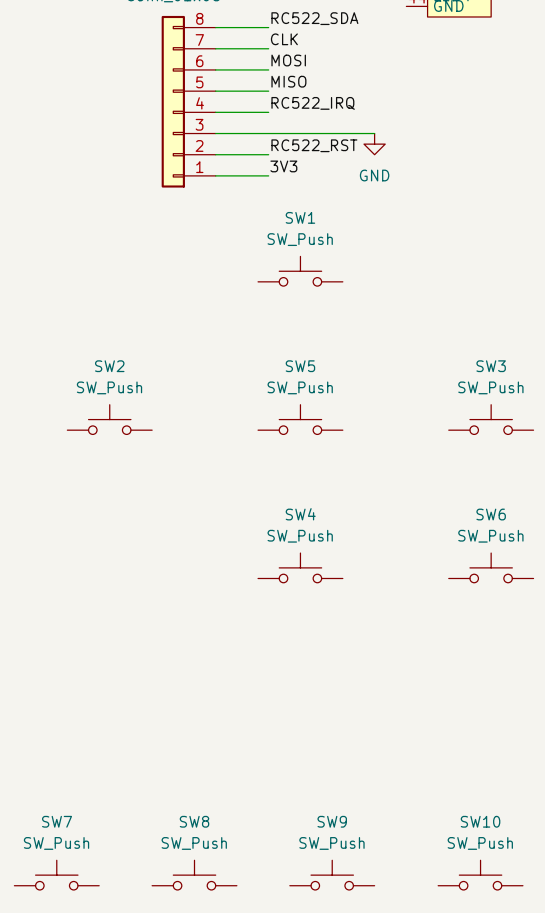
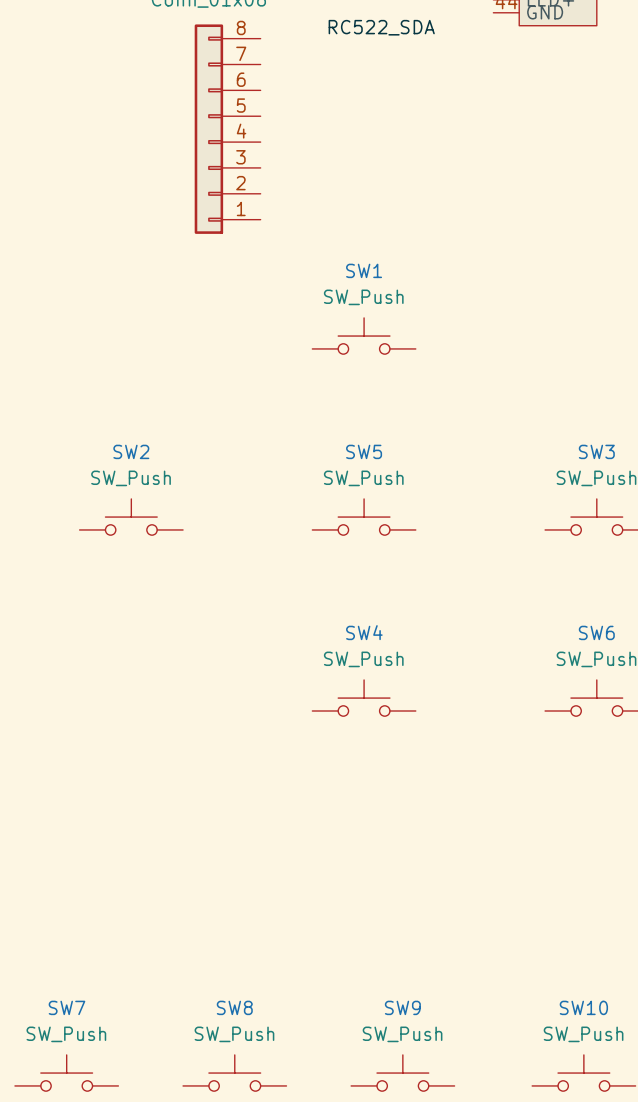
wire: (215, 27) (268, 27) -> none
label: CLK (284, 39) -> none
wire: (215, 48) (268, 48) -> none
label: MOSI (288, 60) -> none
wire: (215, 69) (268, 69) -> none
label: MISO (288, 81) -> none
wire: (215, 91) (268, 91) -> none
label: RC522_IRQ (313, 103) -> none
wire: (215, 112) (268, 112) -> none
wire: (215, 133) (374, 133) -> none
power symbol: GND (374, 144) -> none
label: RC522_RST (314, 145) -> none
wire: (215, 154) (268, 154) -> none
label: 3V3 (283, 166) -> none
wire: (215, 175) (268, 175) -> none

